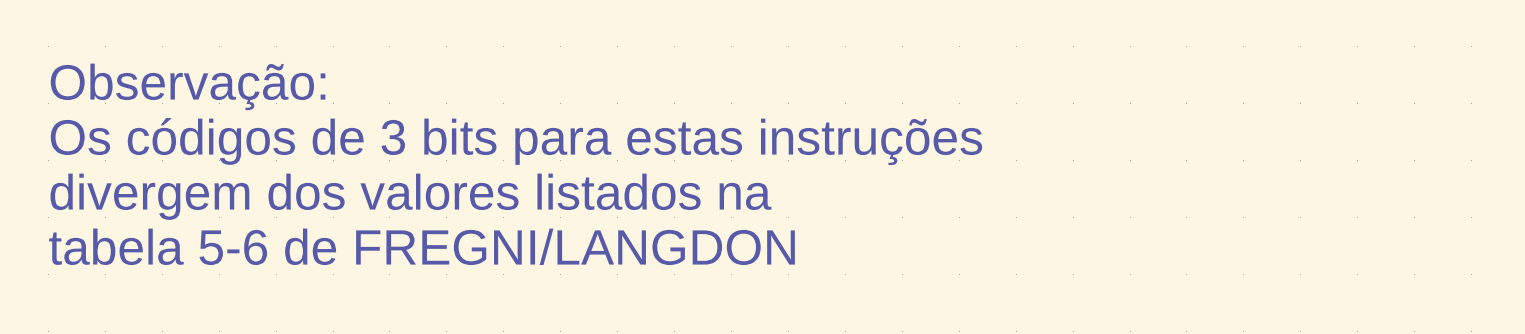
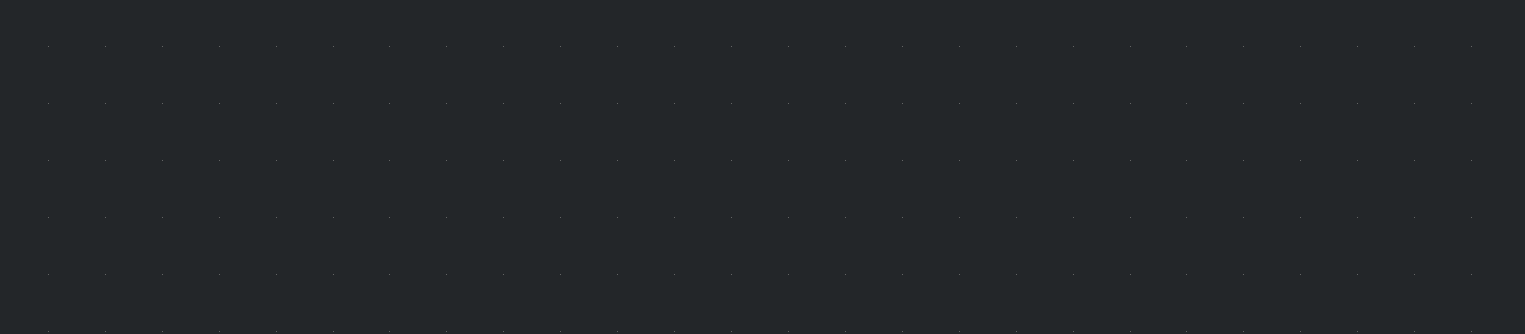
text: Observação: (188, 86) -> none
text: Os códigos de 3 bits para estas instruções (516, 141) -> none
text: divergem dos valores listados na (410, 196) -> none
text: tabela 5-6 de FREGNI/LANGDON (422, 246) -> none

